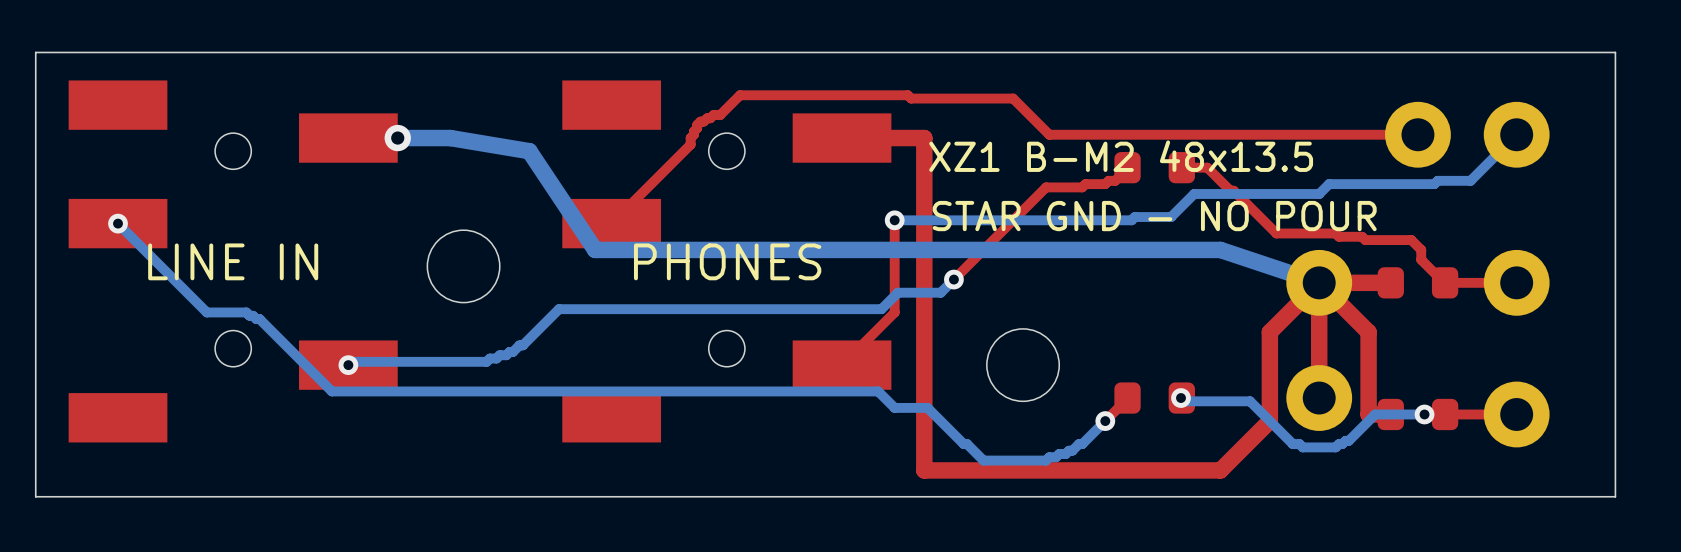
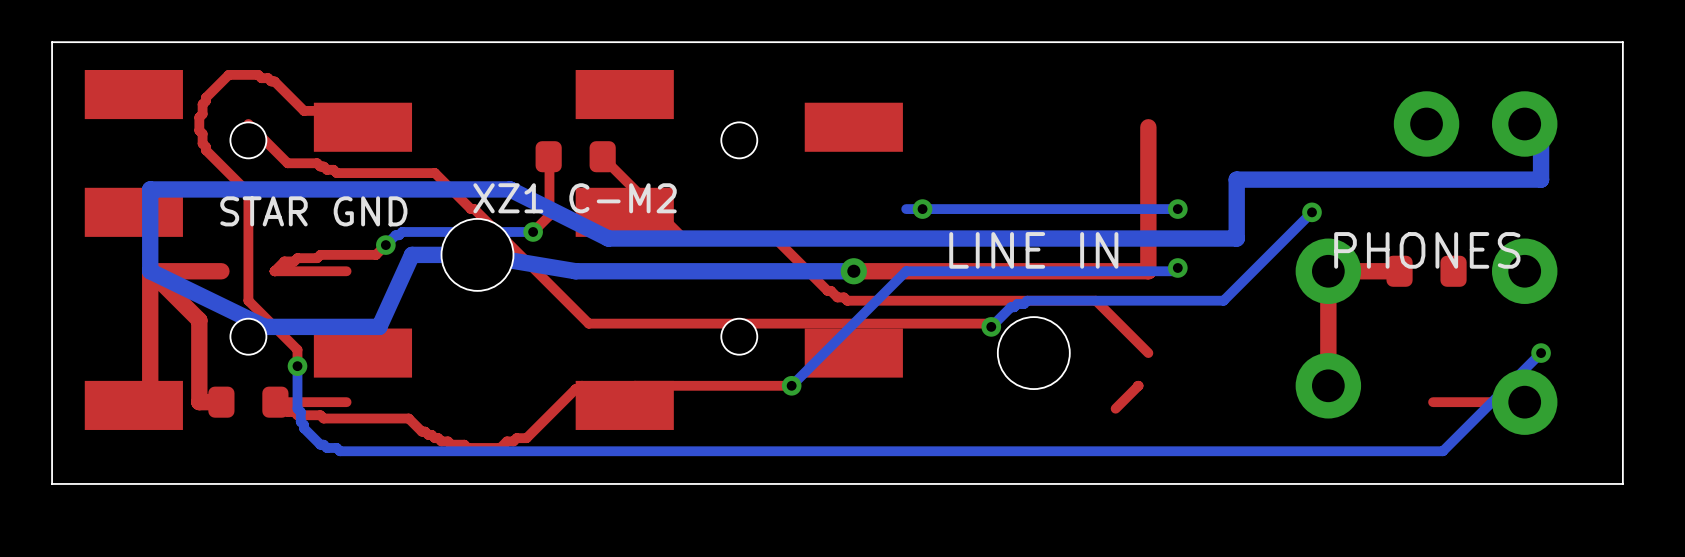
top track: none -> (248, 123) (287, 163) (317, 163) (336, 173) (434, 173) (470, 209) (474, 209) (588, 323) (988, 323) (991, 326)
top track: none -> (346, 123) (340, 117) (333, 114) (326, 114) (323, 110) (304, 110) (274, 81) (268, 78) (261, 78) (258, 74) (228, 74) (205, 97) (202, 104) (202, 114) (199, 117) (199, 130) (202, 133) (202, 143) (205, 150) (248, 192) (248, 300) (297, 349) (297, 366)
top track: (1417, 134) (1049, 134) (1013, 98) (911, 98) (907, 95) (740, 95) (720, 115) (713, 115) (700, 121) (690, 138) (690, 144) (611, 223) -> none
bottom track: (1516, 134) (1470, 180) (1437, 180) (1434, 184) (1329, 184) (1319, 193) (1194, 193) (1171, 217) (1134, 217) (1131, 220) -> (1177, 209) (1141, 209)
bottom track: (397, 138) (450, 138) (529, 151) (595, 249) -> (853, 271) (575, 271) (477, 254) (412, 254) (379, 326) (264, 326) (150, 271) (150, 189) (510, 189) (608, 238)
via: (397, 138) -> none
top track: (842, 138) (924, 138) (924, 470) (1220, 470) (1269, 421) (1269, 332) (1319, 282) (1368, 332) (1368, 414) (1390, 414) -> none
top track: none -> (1148, 127) (1148, 271) (853, 271)
text: XZ1 B-M2 48x13.5 (1121, 156) -> none
top track: none -> (548, 156) (549, 215) (533, 231)
part: none -> (575, 156)
top track: none -> (602, 156) (683, 238) (775, 238) (827, 290) (830, 290) (837, 297) (844, 297) (847, 300) (1096, 300) (1148, 353)
top track: (1127, 167) (1115, 180) (1108, 180) (1105, 184) (1085, 184) (1082, 187) (1046, 187) (953, 279) -> none
part: (1154, 167) -> none
top track: (1181, 167) (1207, 167) (1276, 233) (1335, 233) (1338, 236) (1362, 236) (1365, 240) (1411, 240) (1421, 249) (1421, 259) (1444, 282) (1516, 282) -> none
text: none -> XZ1 C-M2 (575, 198)
text: STAR GND - NO POUR (1154, 216) -> none
top track: (894, 220) (894, 312) (842, 365) -> none
via position: (894, 220) -> (922, 209)
via: none -> (1177, 209)
text: none -> STAR GND (313, 211)
bottom track: (118, 223) (206, 312) (246, 312) (259, 319) (331, 391) (878, 391) (894, 407) (927, 407) (963, 444) (967, 444) (983, 460) (1046, 460) (1059, 453) (1065, 453) (1078, 444) (1082, 444) (1105, 421) -> none
via: (118, 223) -> none
bottom track: none -> (1311, 212) (1223, 300) (1027, 300) (1024, 303) (1017, 303) (1010, 307) (991, 326)
via: none -> (1311, 212)
bottom track: none -> (533, 231) (402, 231) (395, 235) (385, 245)
via: none -> (533, 231)
bottom track: (1220, 249) (1319, 282) -> (1230, 238) (1236, 238) (1236, 179) (1541, 179) (1541, 127)
top track: none -> (385, 245) (376, 254) (320, 254) (317, 258) (297, 258) (294, 261) (284, 261) (274, 271) (346, 271)
via: none -> (385, 245)
text position: LINE IN (233, 261) -> LINE IN (1033, 250)
text position: PHONES (727, 261) -> PHONES (1427, 250)
bottom track: (953, 279) (940, 292) (897, 292) (881, 309) (559, 309) (522, 345) (519, 345) (506, 355) (489, 358) (486, 361) (351, 361) (348, 365) -> none
via: (953, 279) -> none
bottom track: none -> (1177, 267) (1174, 271) (906, 271) (791, 385)
via: none -> (1177, 267)
top track: none -> (150, 271) (150, 385)
top track: none -> (150, 271) (199, 320) (199, 402) (221, 402)
top track: none -> (221, 271) (150, 271)
via: none -> (853, 271)
via: none -> (991, 326)
via: (348, 365) -> none
bottom track: none -> (1541, 353) (1442, 451) (340, 451) (336, 447) (326, 447) (320, 444) (304, 428) (300, 421) (300, 411) (297, 408) (297, 366)
via: none -> (1541, 353)
via: none -> (297, 366)
top track: none -> (581, 385) (578, 389) (575, 389) (526, 438) (516, 438) (513, 441) (506, 441) (500, 447) (467, 447) (464, 444) (451, 444) (448, 441) (441, 441) (421, 431) (408, 418) (323, 418) (320, 415) (297, 415) (294, 411) (287, 411) (281, 408) (274, 402) (346, 402)
top track: none -> (791, 385) (634, 385)
via: none -> (791, 385)
part: (1154, 398) -> none
bottom track: (1181, 398) (1184, 401) (1250, 401) (1292, 444) (1299, 444) (1302, 447) (1335, 447) (1348, 440) (1375, 414) (1424, 414) -> none
via: (1181, 398) -> none
part: none -> (248, 402)
part: (1417, 414) -> none
via: (1424, 414) -> none
via: (1105, 421) -> none

